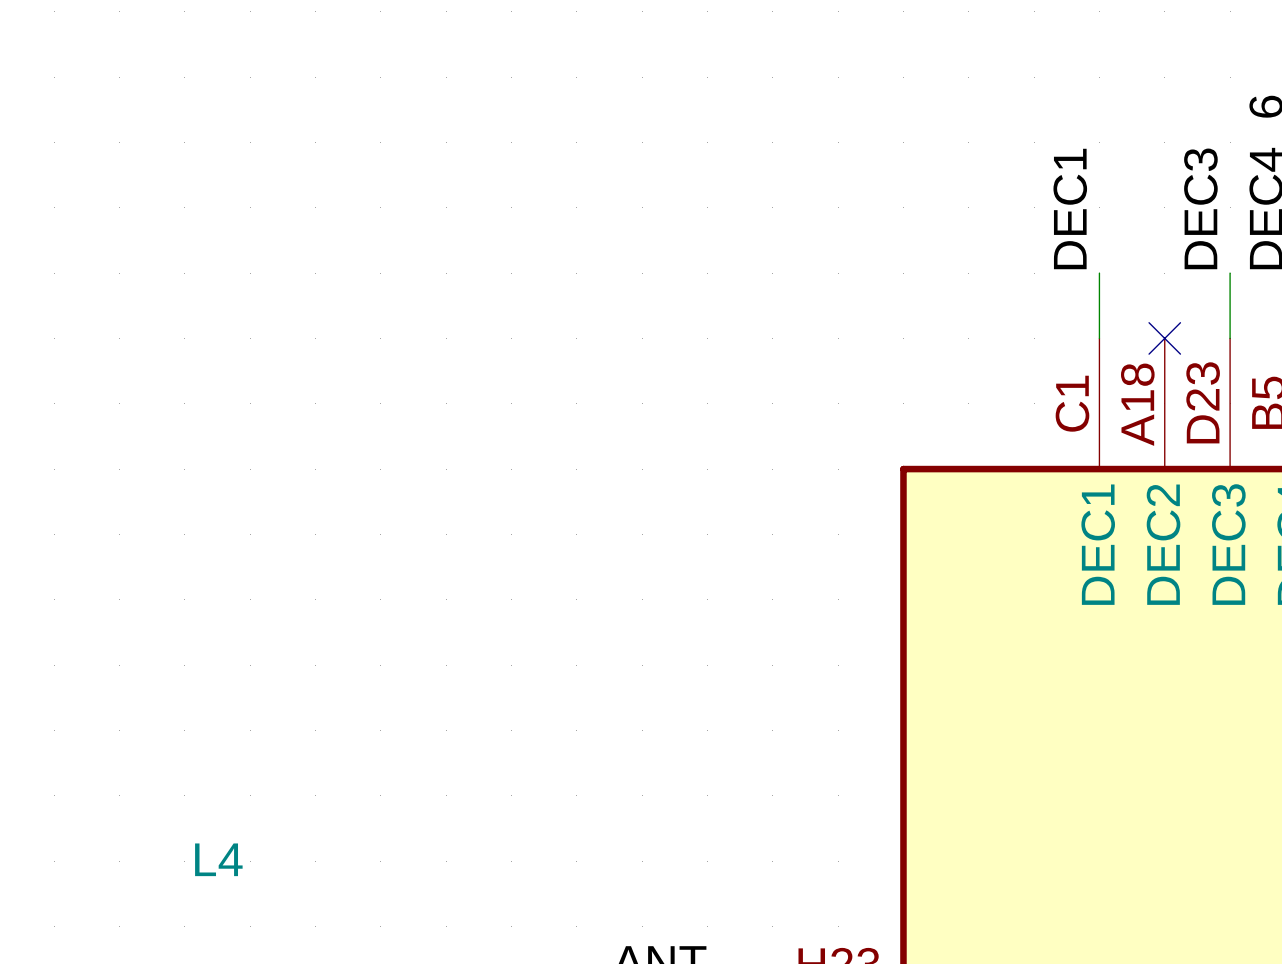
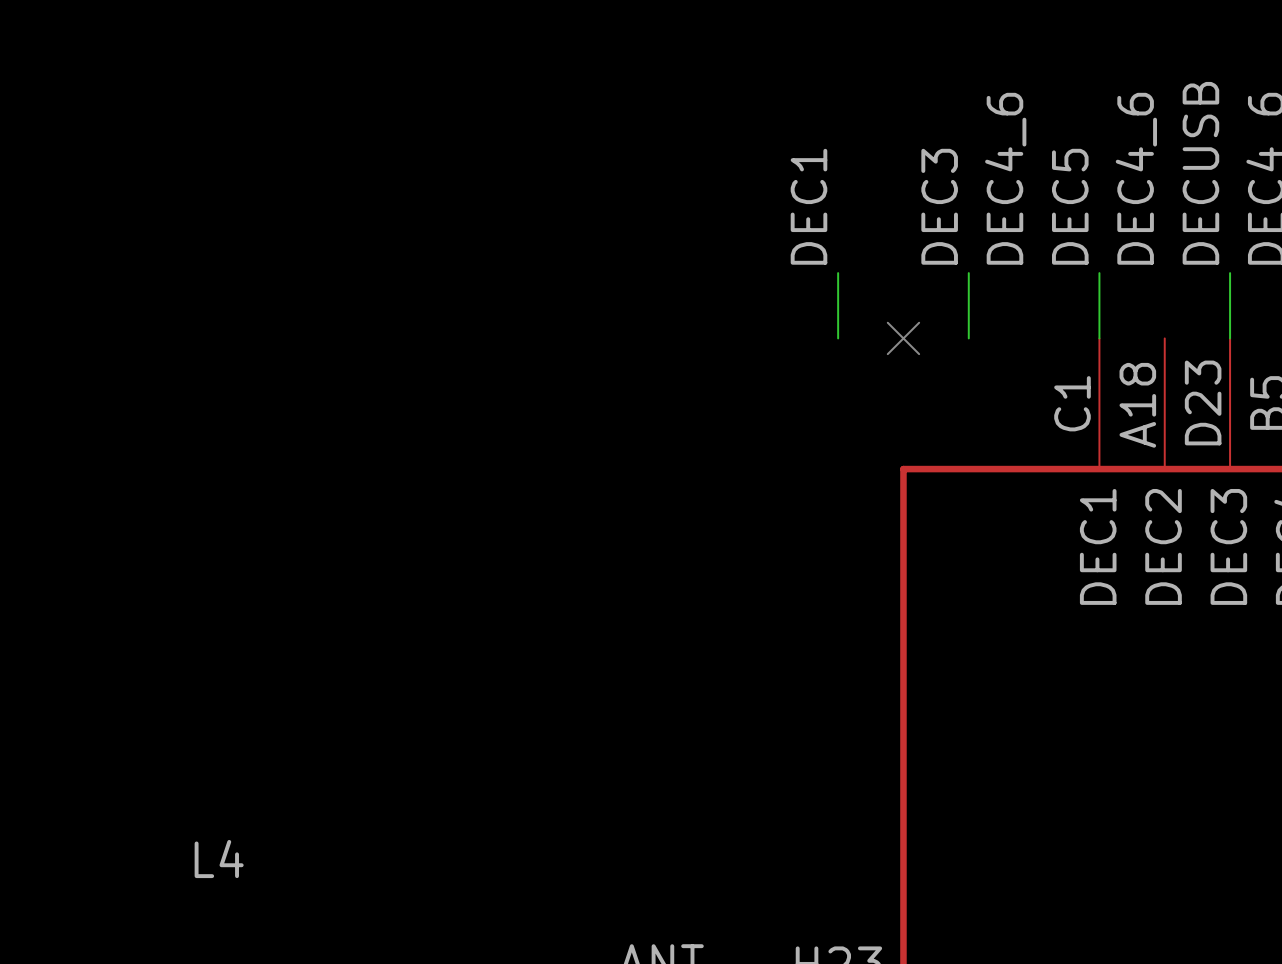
label: none -> DEC4_6 (1005, 178)
label: none -> DEC4_6 (1136, 178)
label: none -> DEC3 (939, 206)
label: DEC3 (1200, 208) -> DECUSB (1200, 173)
label: none -> DEC1 (808, 206)
label: DEC1 (1070, 209) -> DEC5 (1070, 206)
wire: none -> (838, 273) (838, 338)
wire: none -> (968, 273) (968, 338)
no-connect mark: none -> (903, 338)
no-connect mark: (1164, 338) -> none

